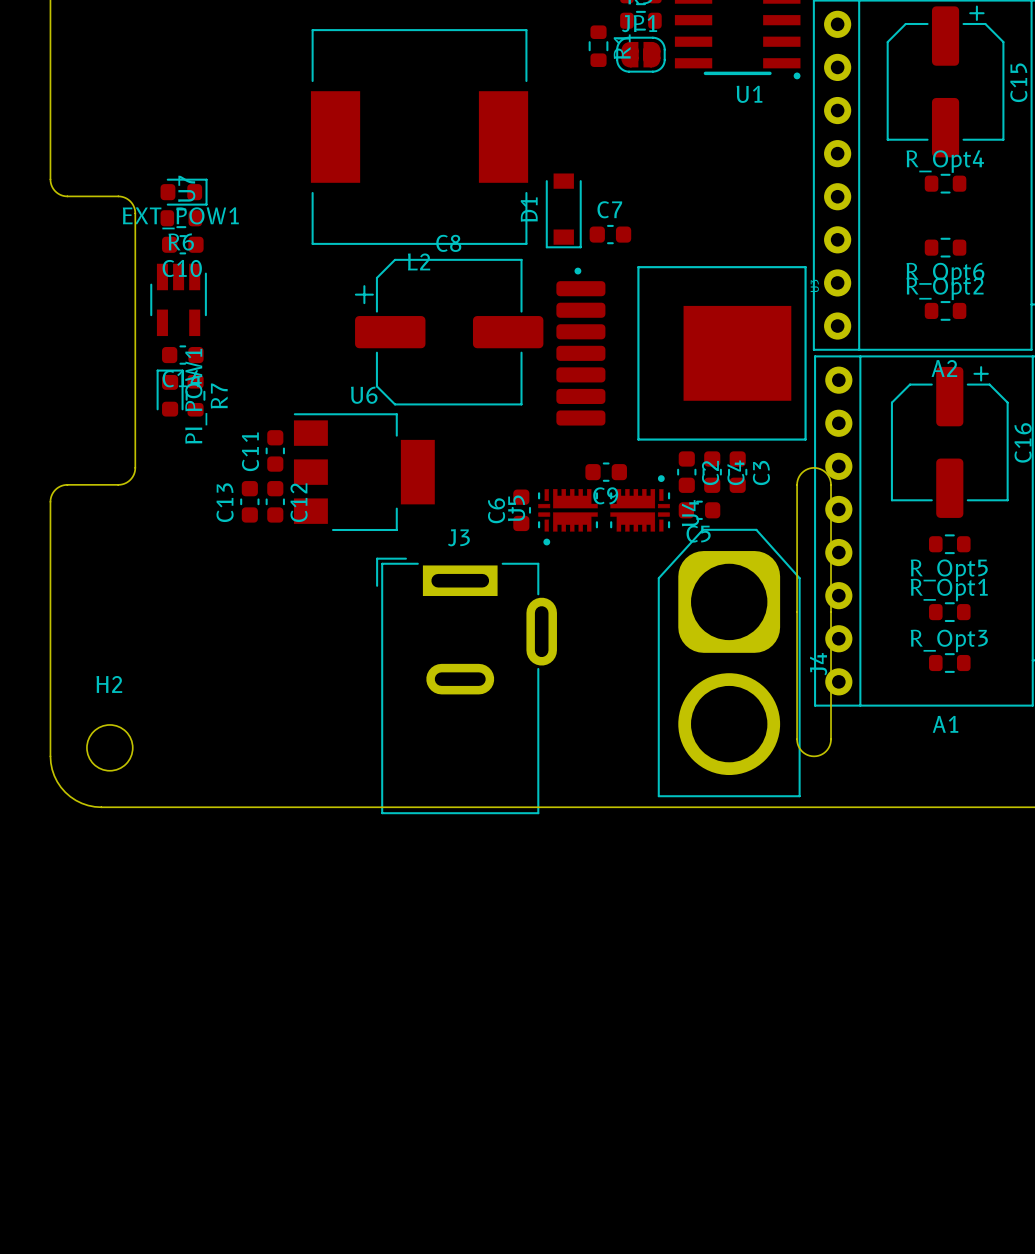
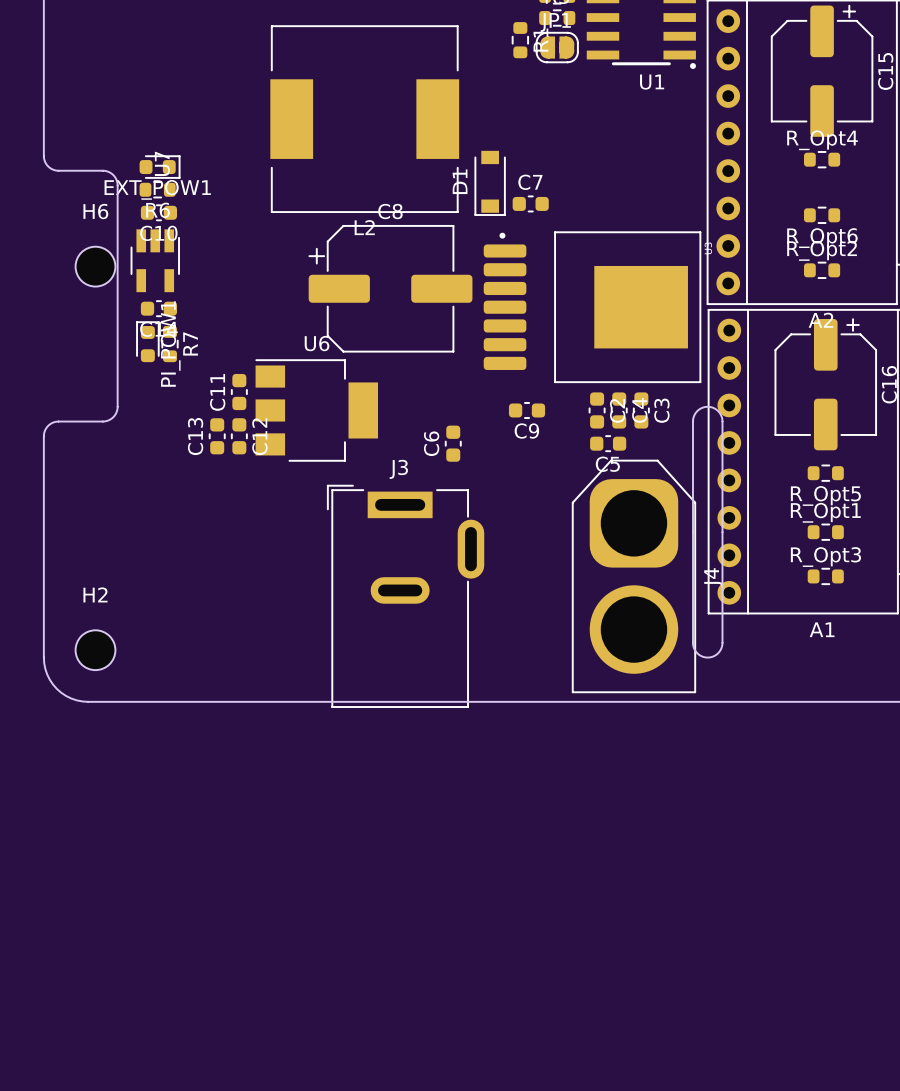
H6: none -> (95, 266)
U4: (640, 503) -> none
U5: (568, 517) -> none

